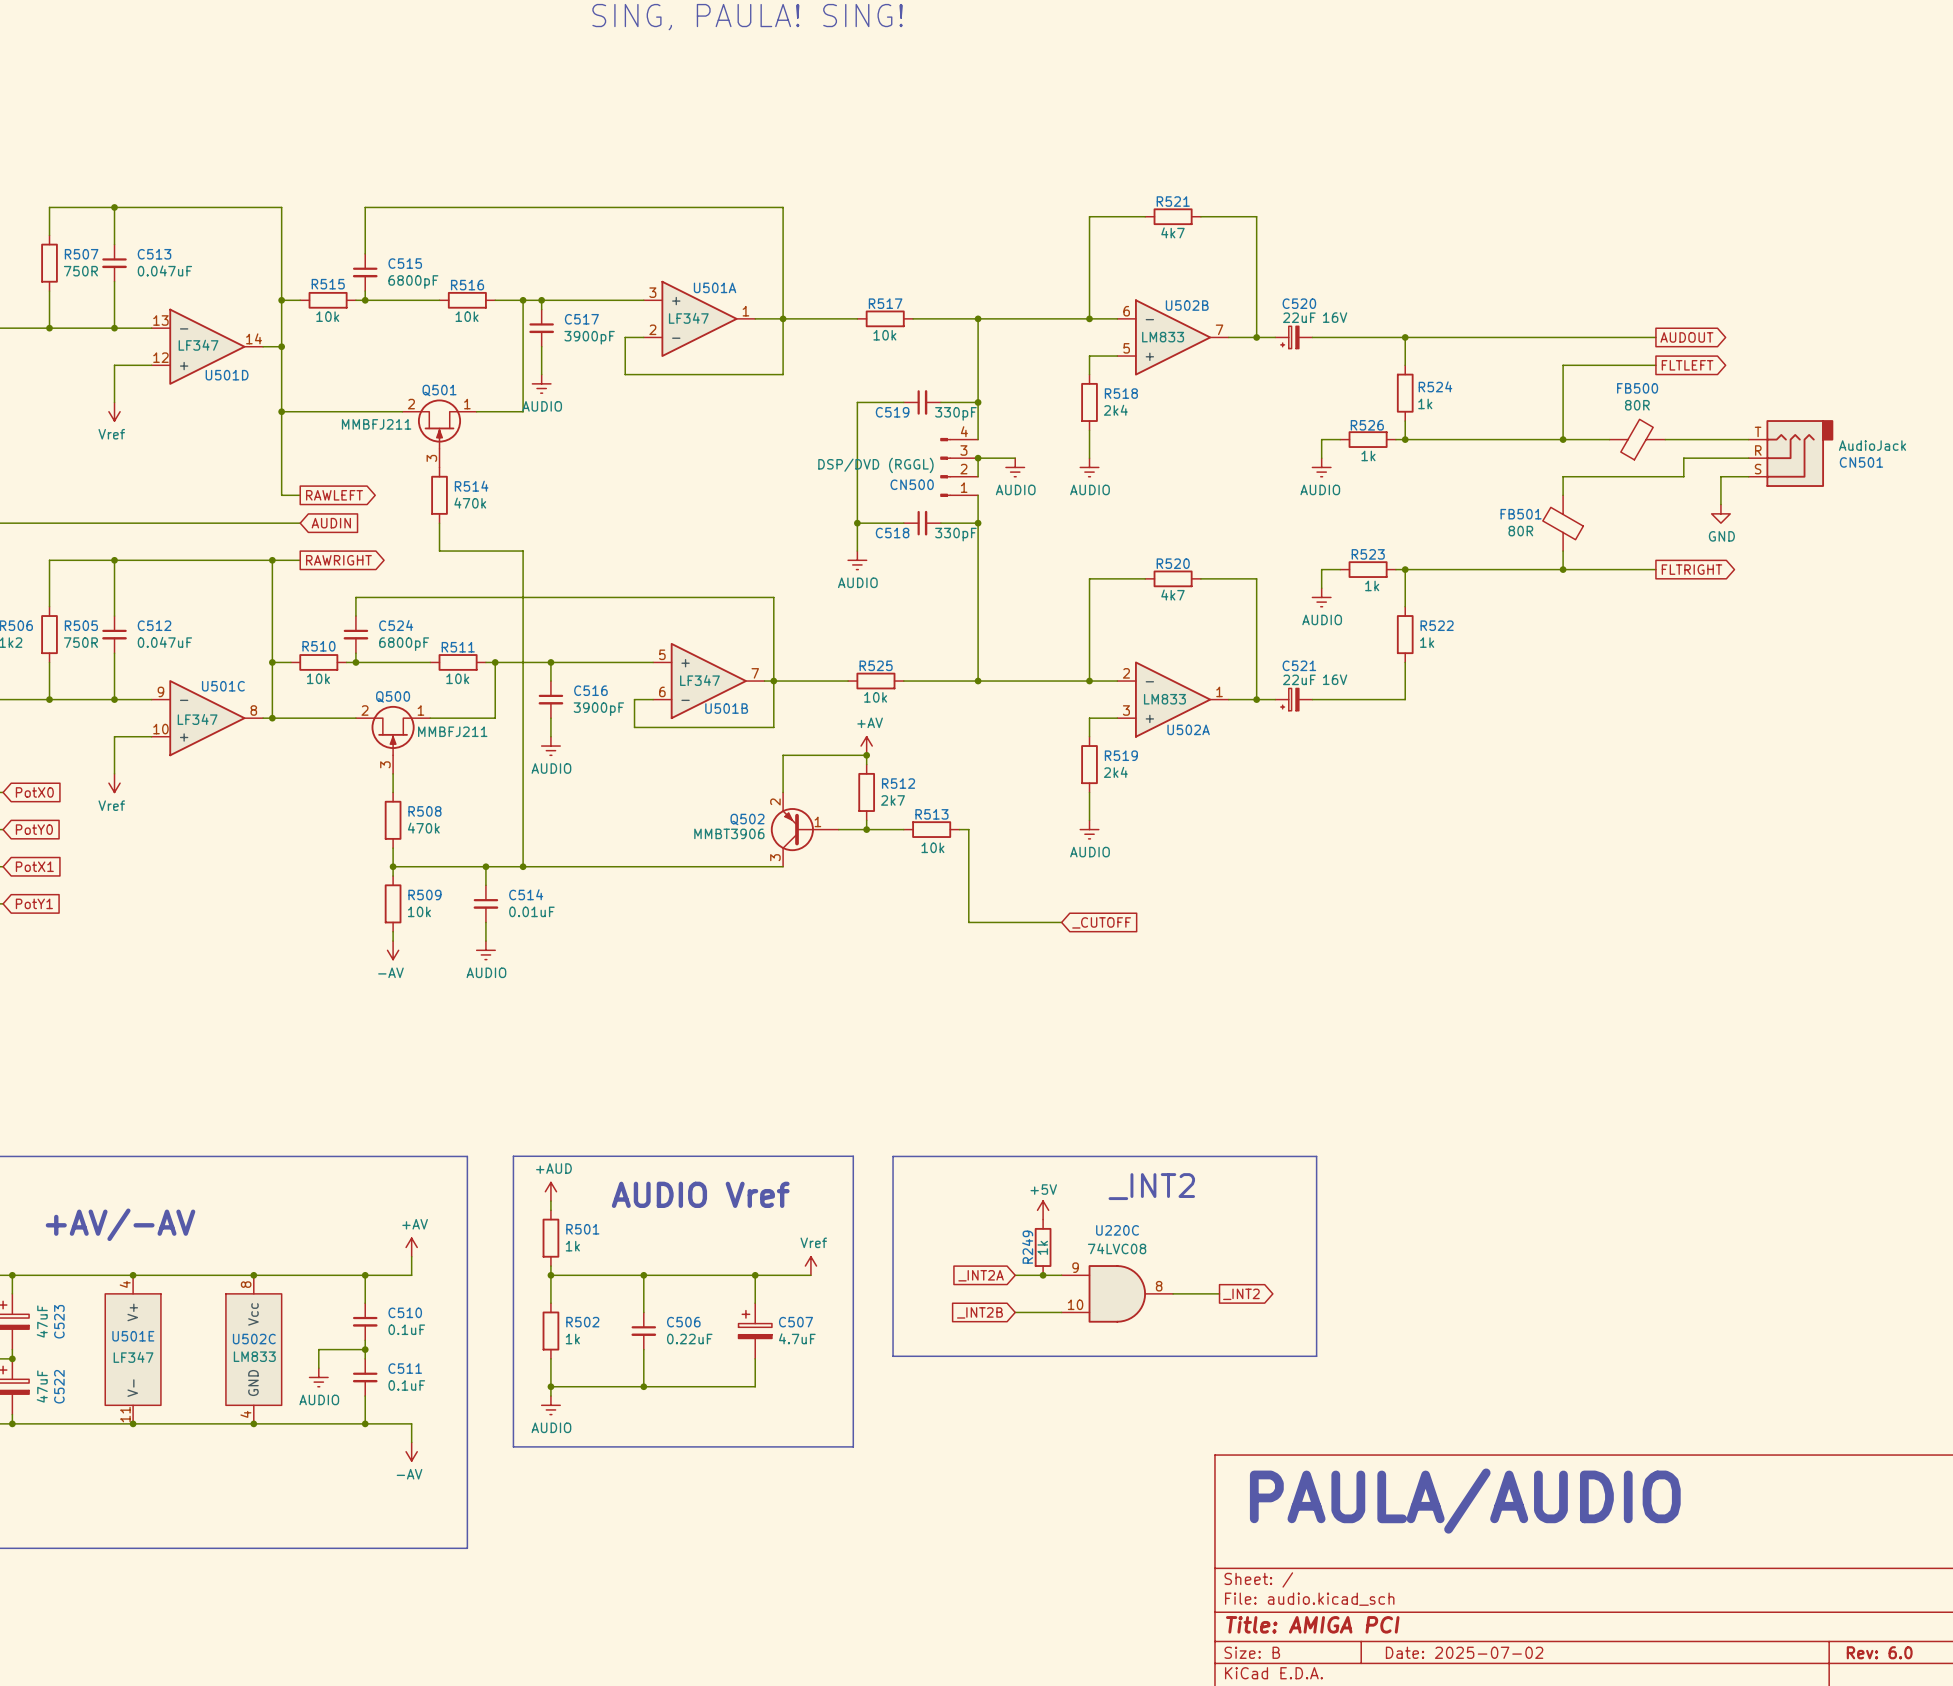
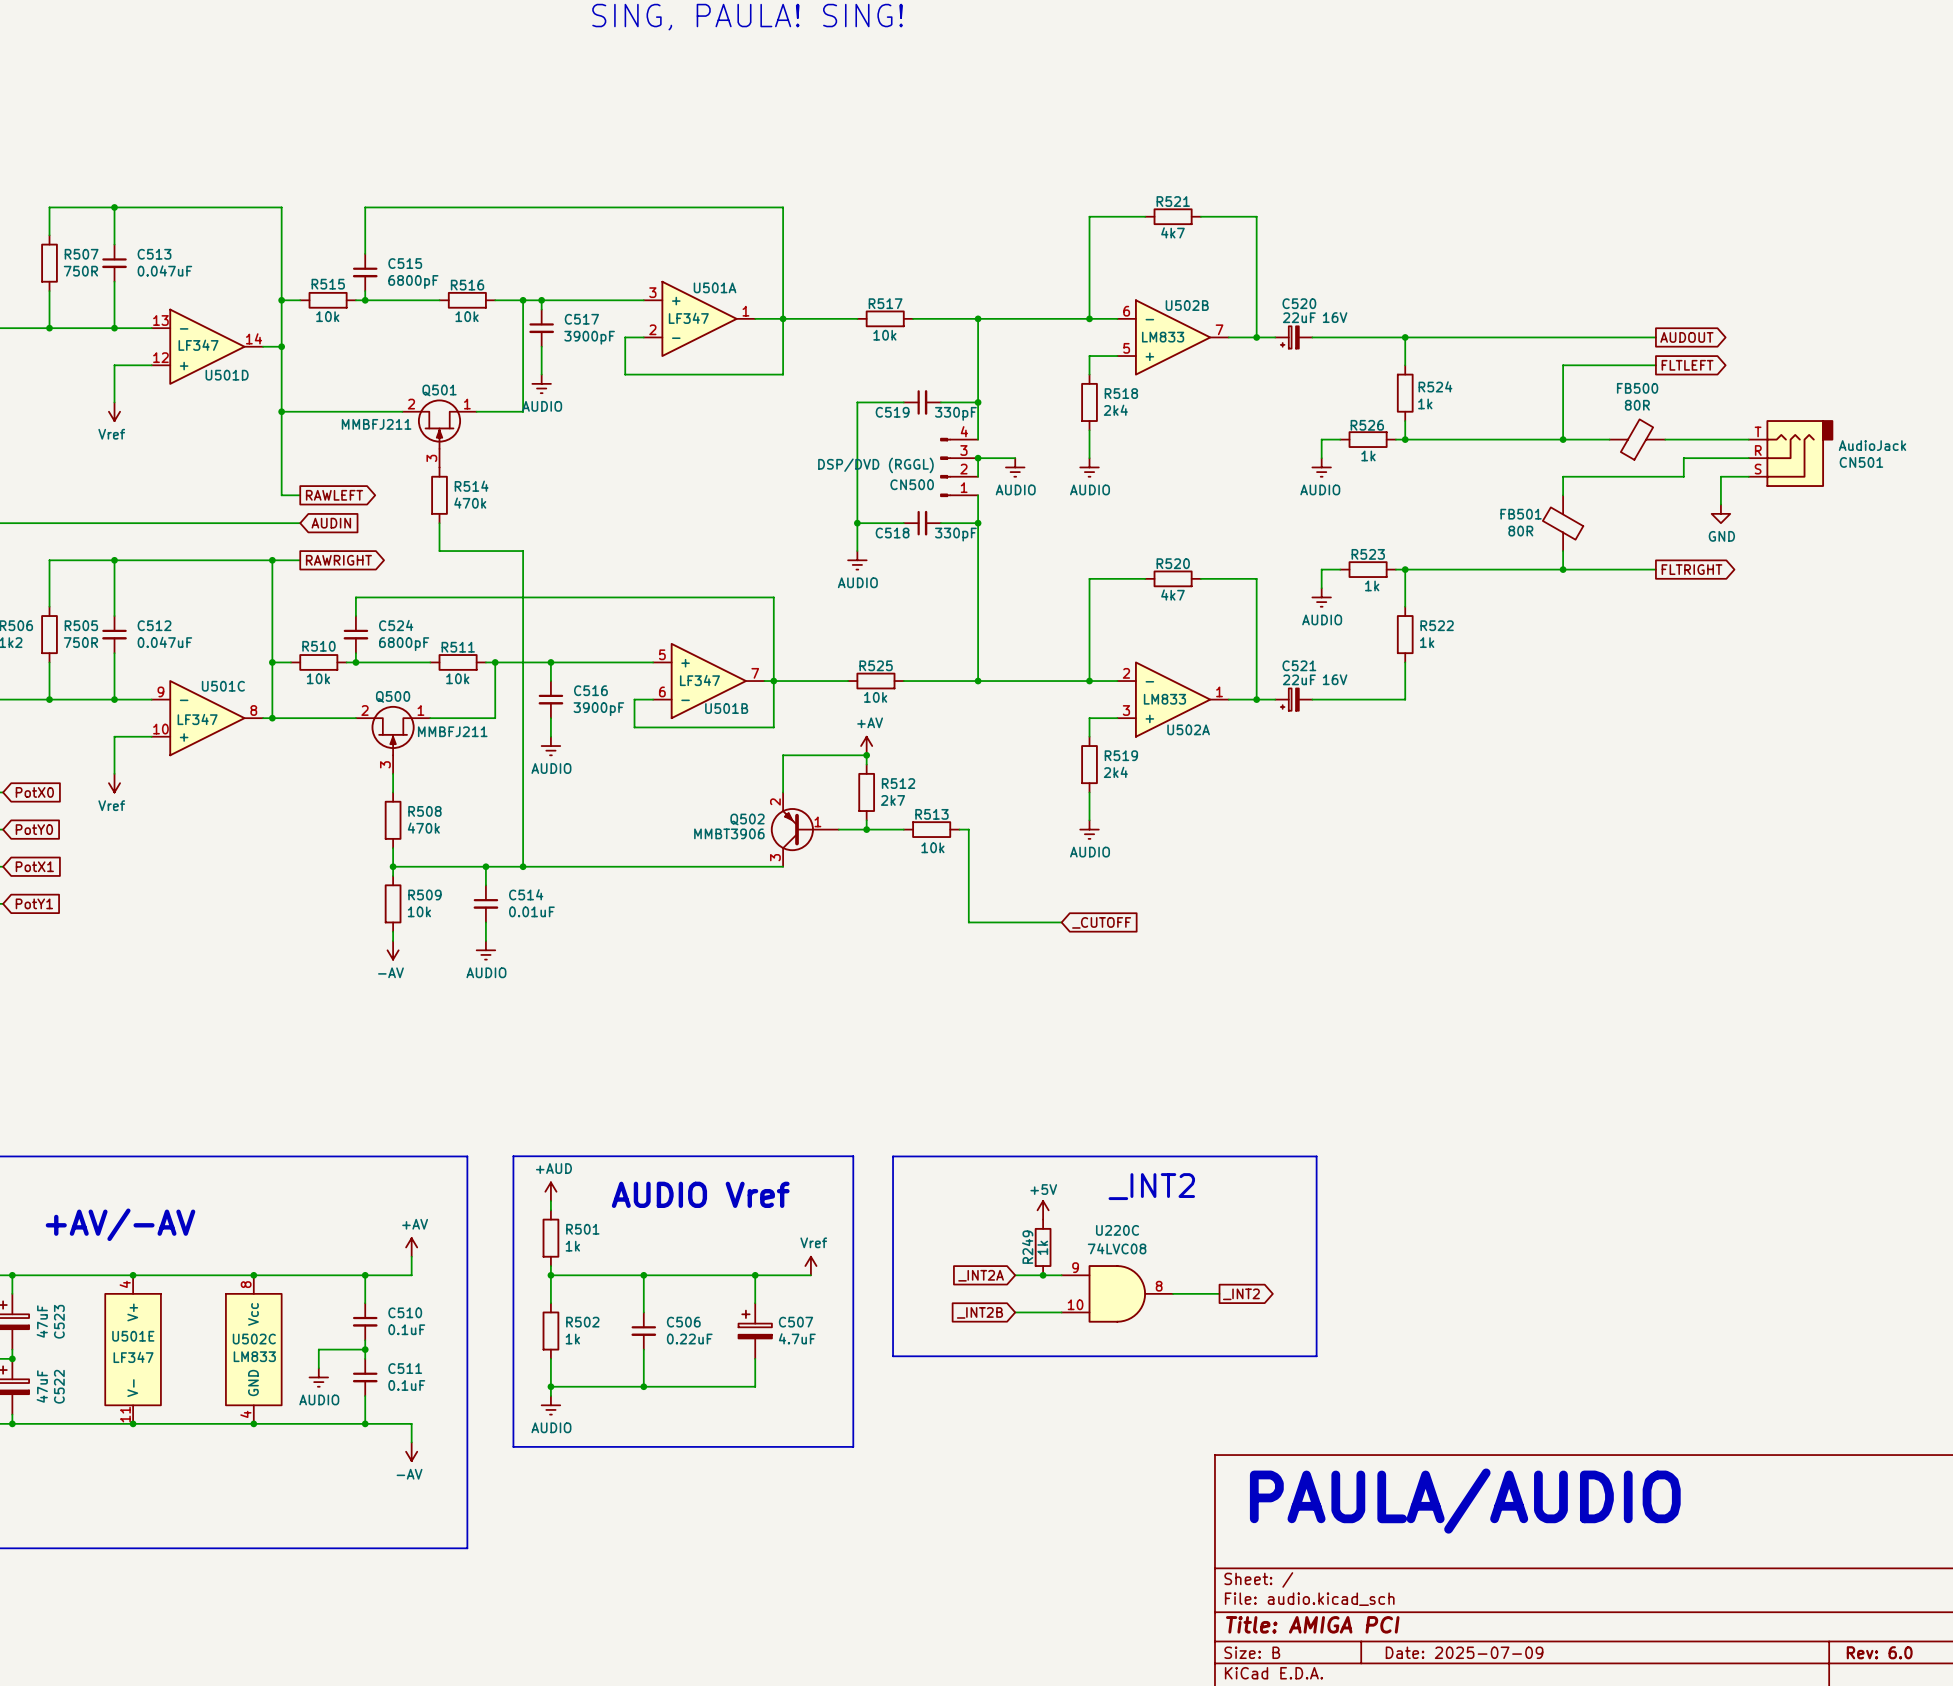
title block: Date: 2025-07-02 (1464, 1652) -> Date: 2025-07-09 (1464, 1652)

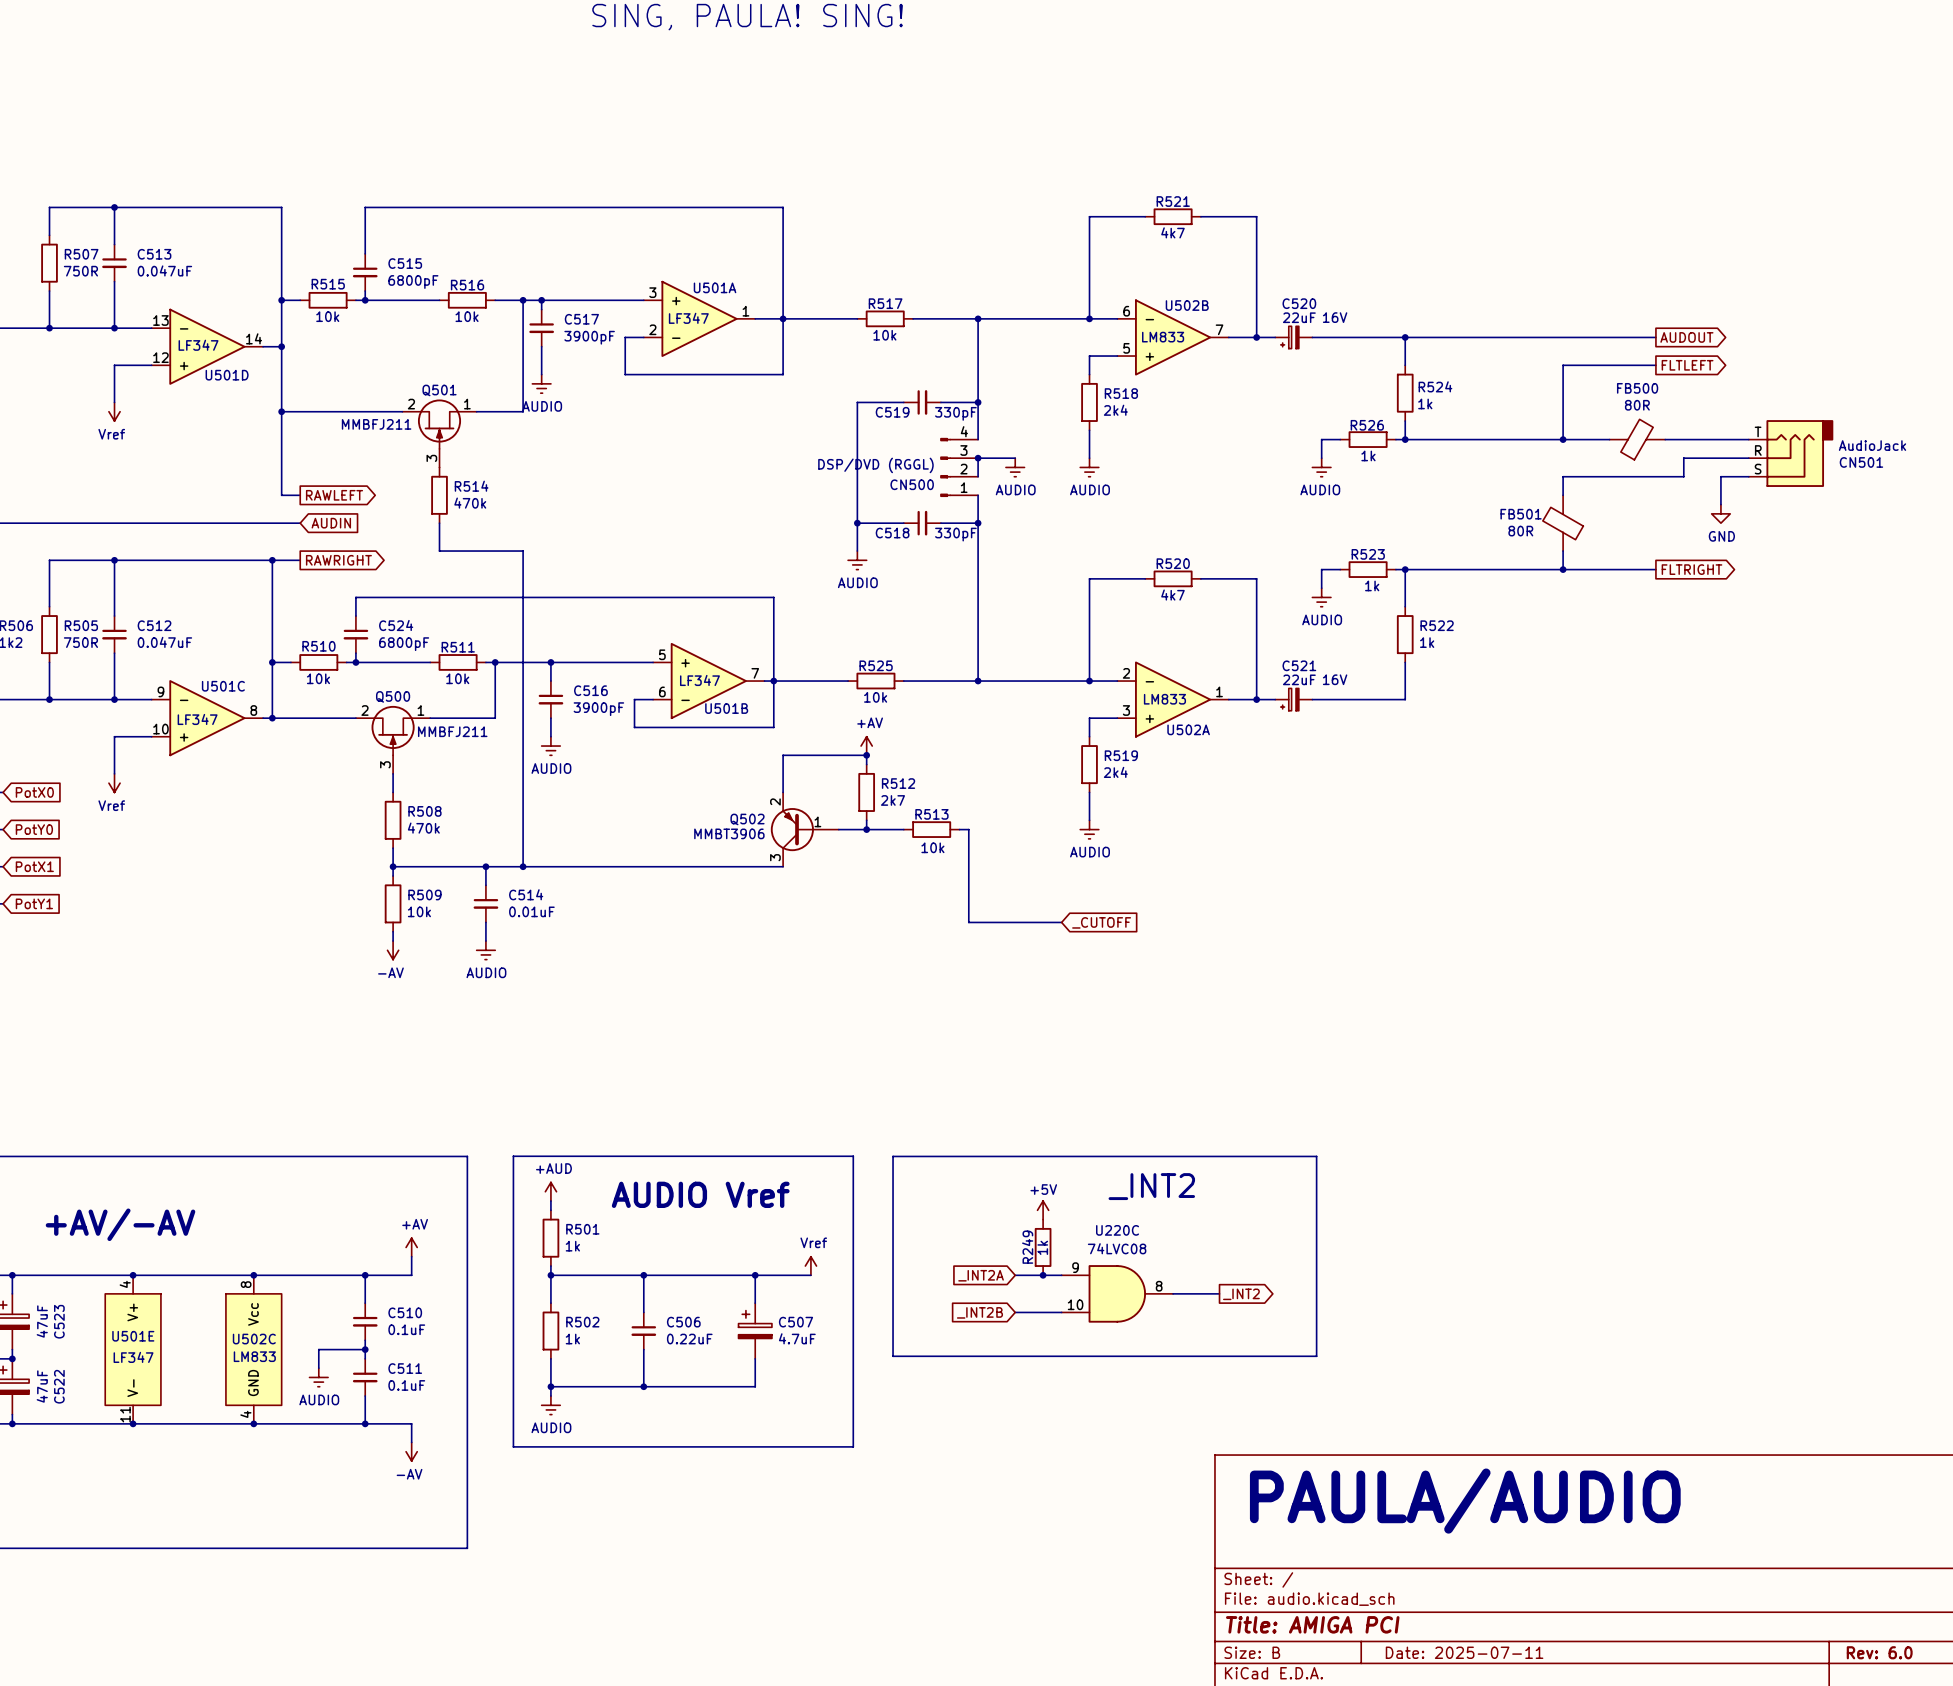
title block: Date: 2025-07-09 (1464, 1652) -> Date: 2025-07-11 (1464, 1652)

